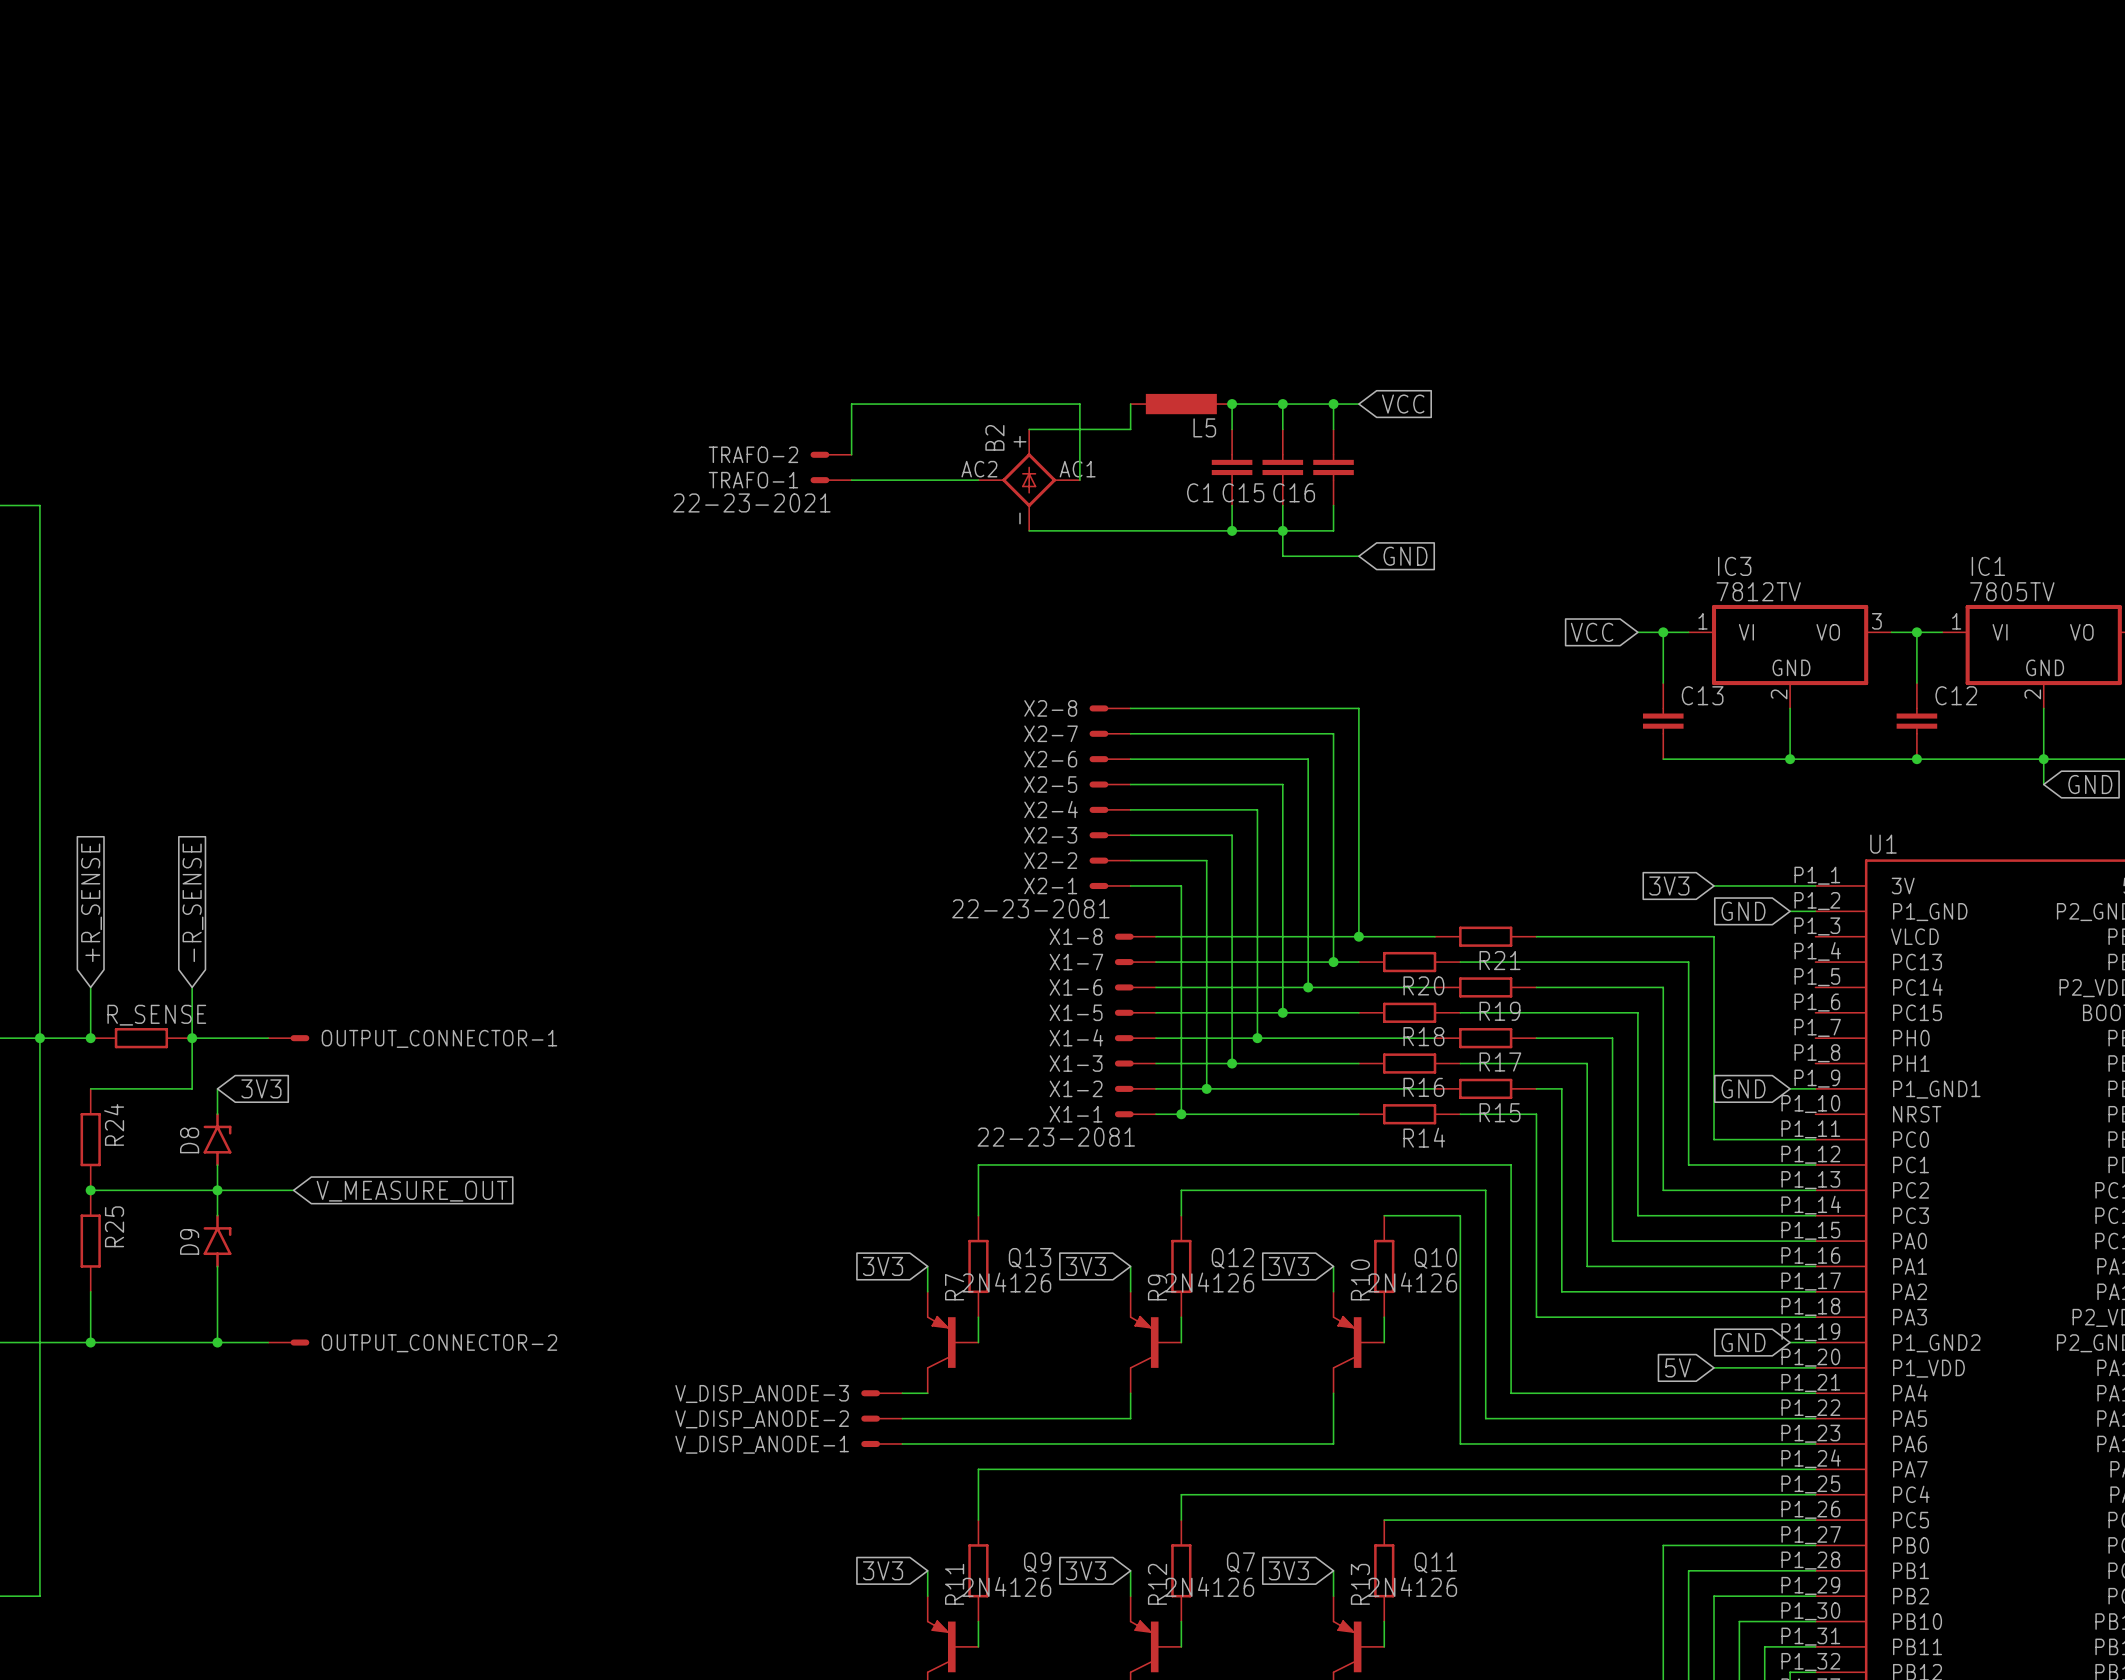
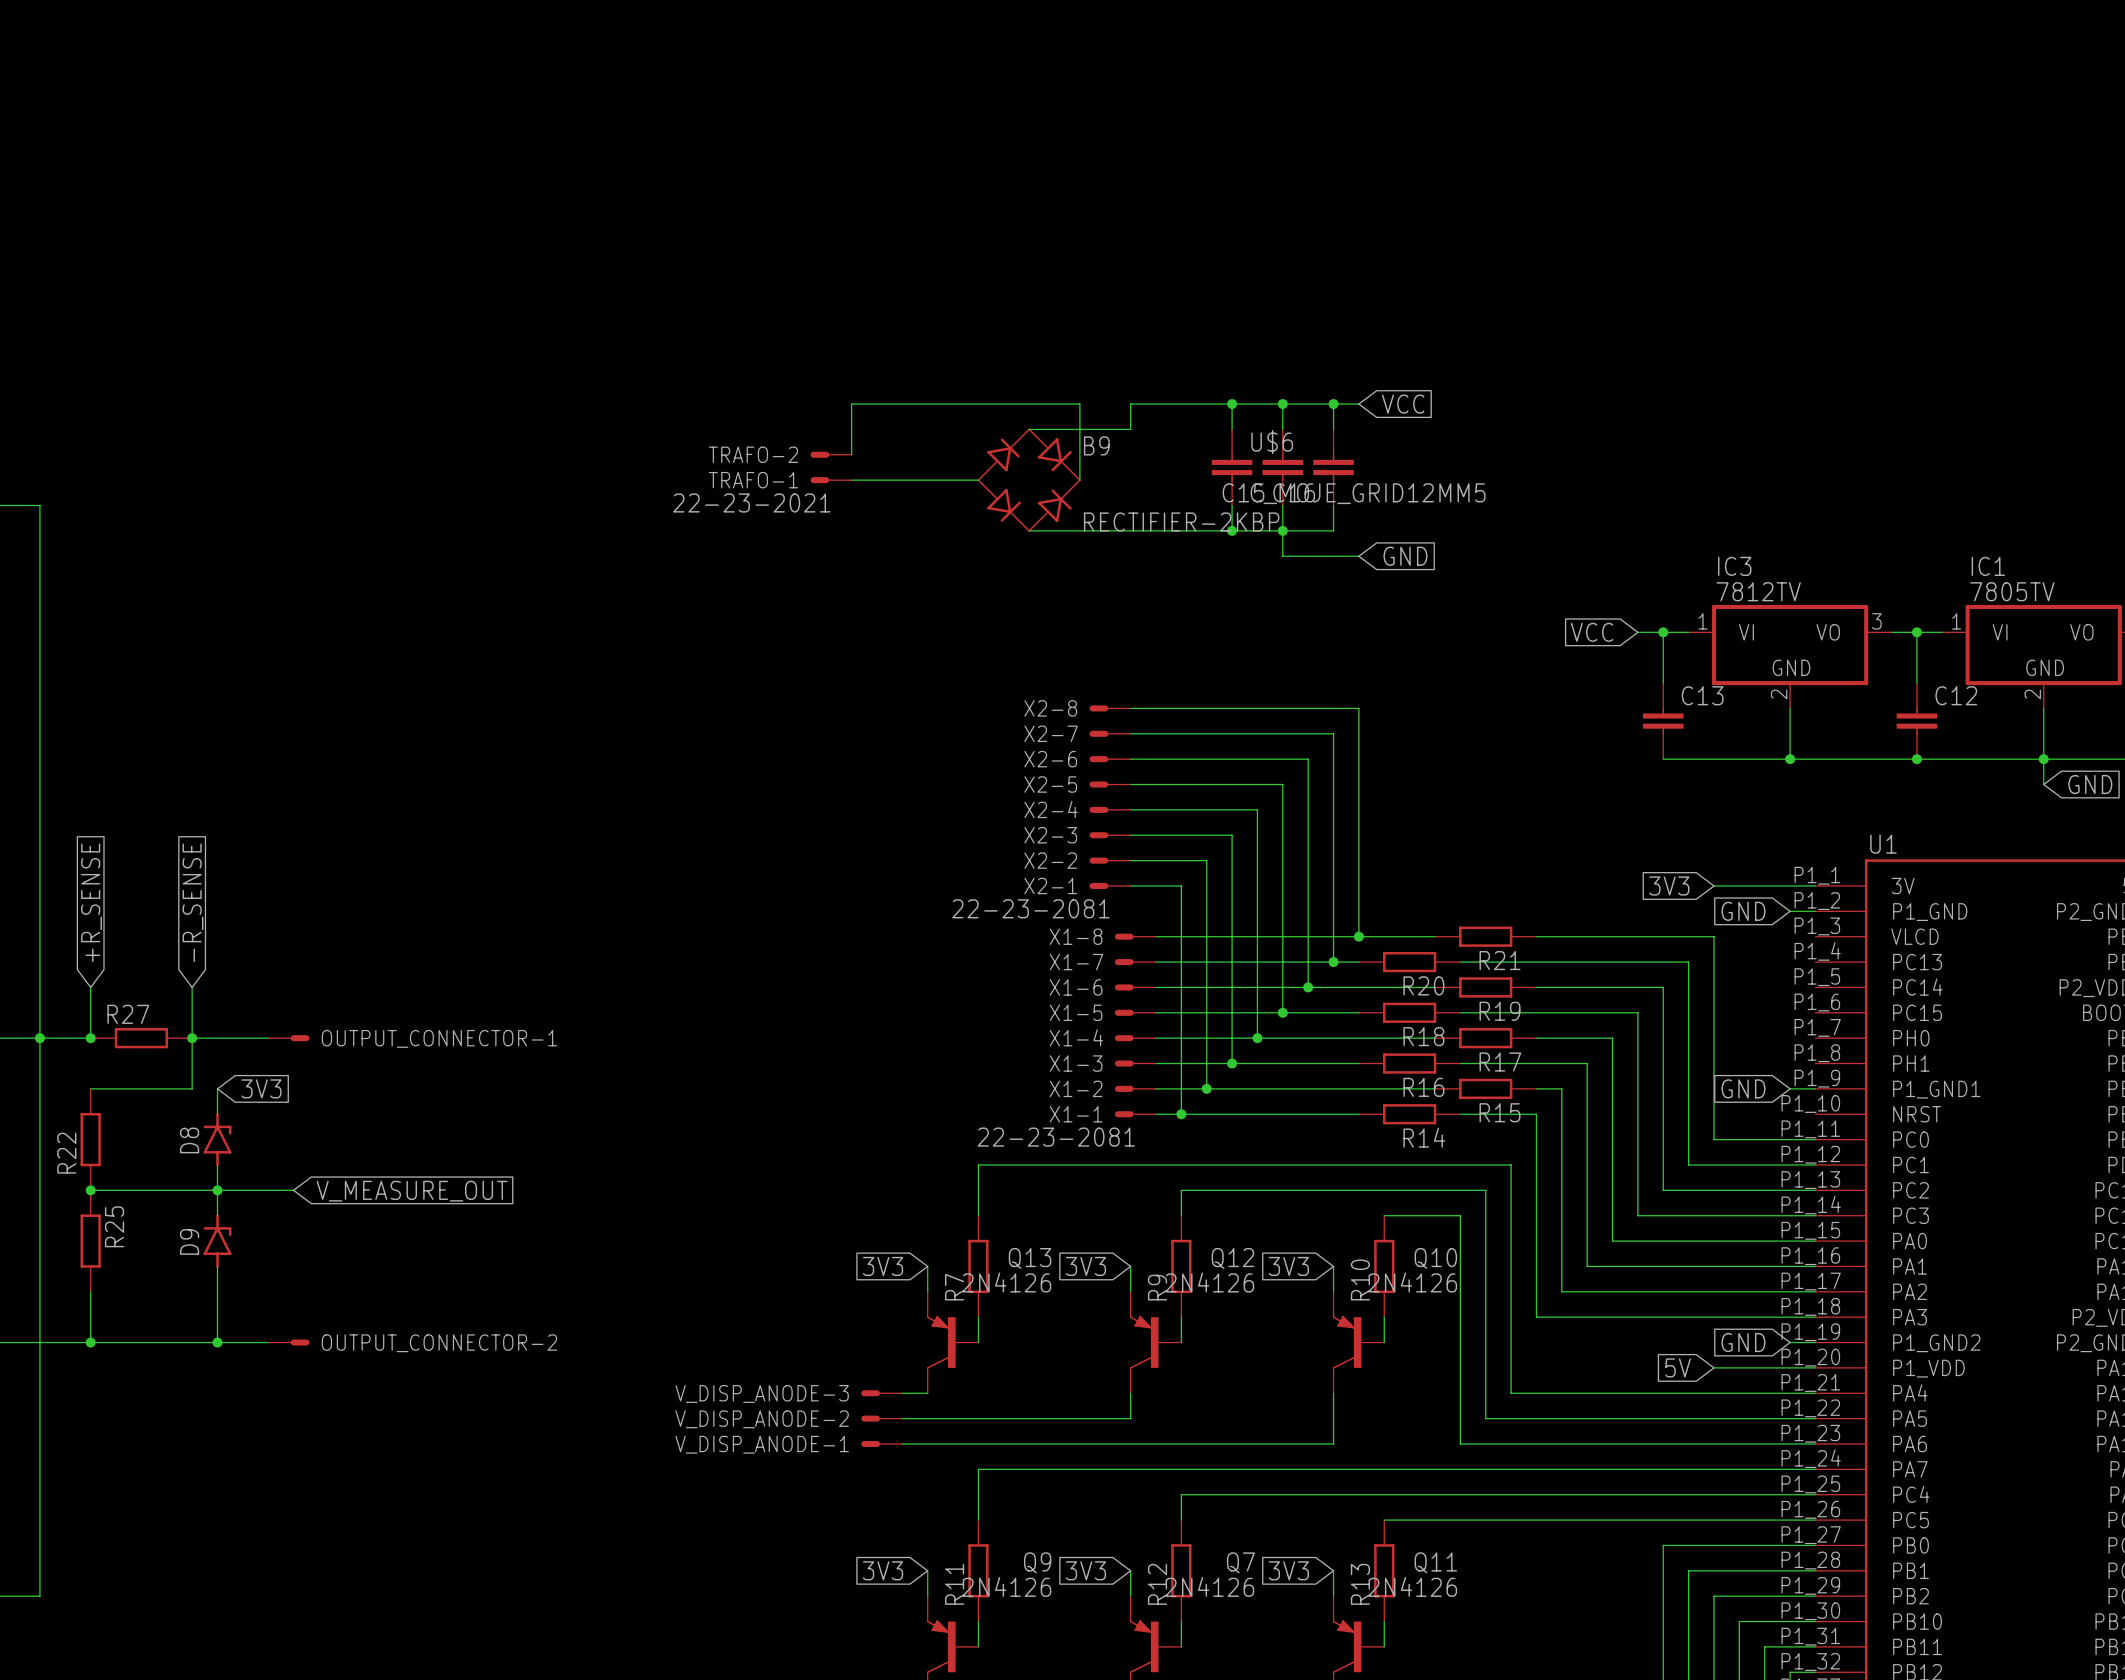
L5: (1181, 404) -> none
B2: (1029, 480) -> none
B9: none -> RECTIFIER-2KBP (1029, 480)
C1 name: C1 (1200, 492) -> U$6 (1272, 442)
C1 value: none -> C_MOJE_GRID12MM5 (1368, 493)
R_SENSE name: R_SENSE (156, 1015) -> R27 (128, 1014)
R24 name: R24 (114, 1124) -> R22 (66, 1153)

